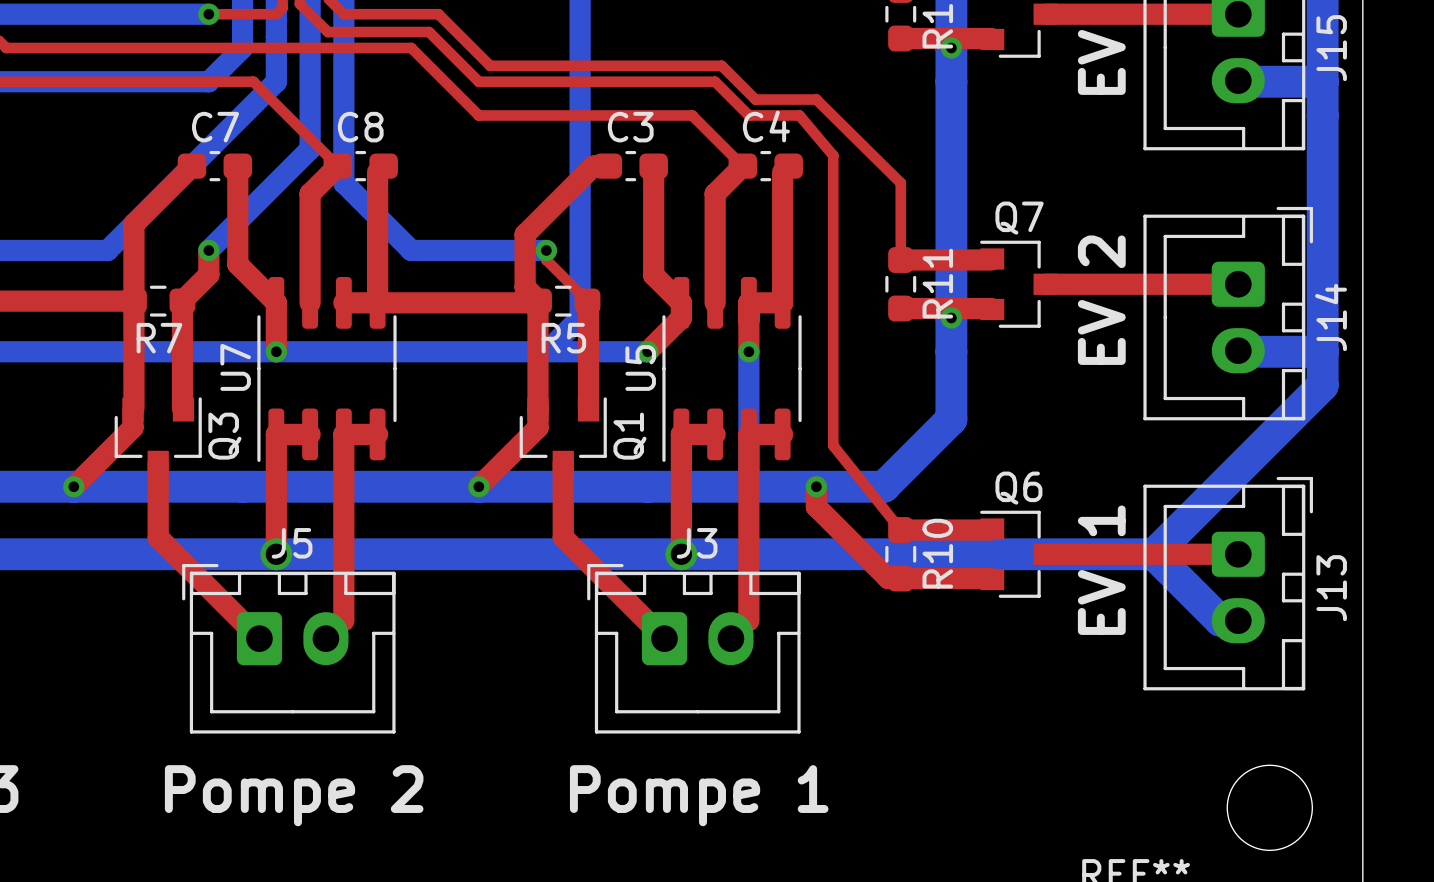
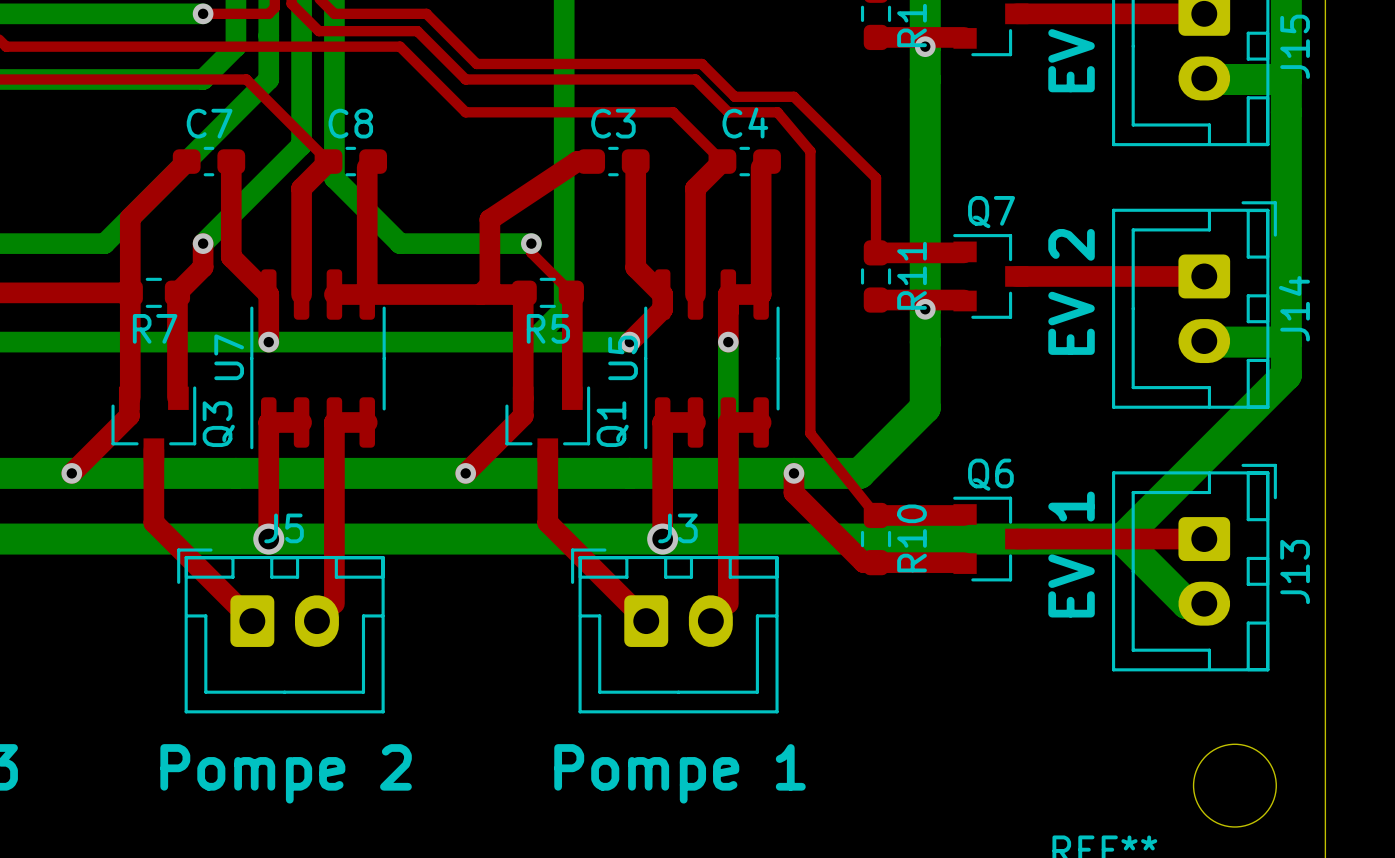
top track: (593, 166) (525, 234) (525, 287) (539, 301) -> (577, 161) (489, 219) (489, 285) (480, 294)

